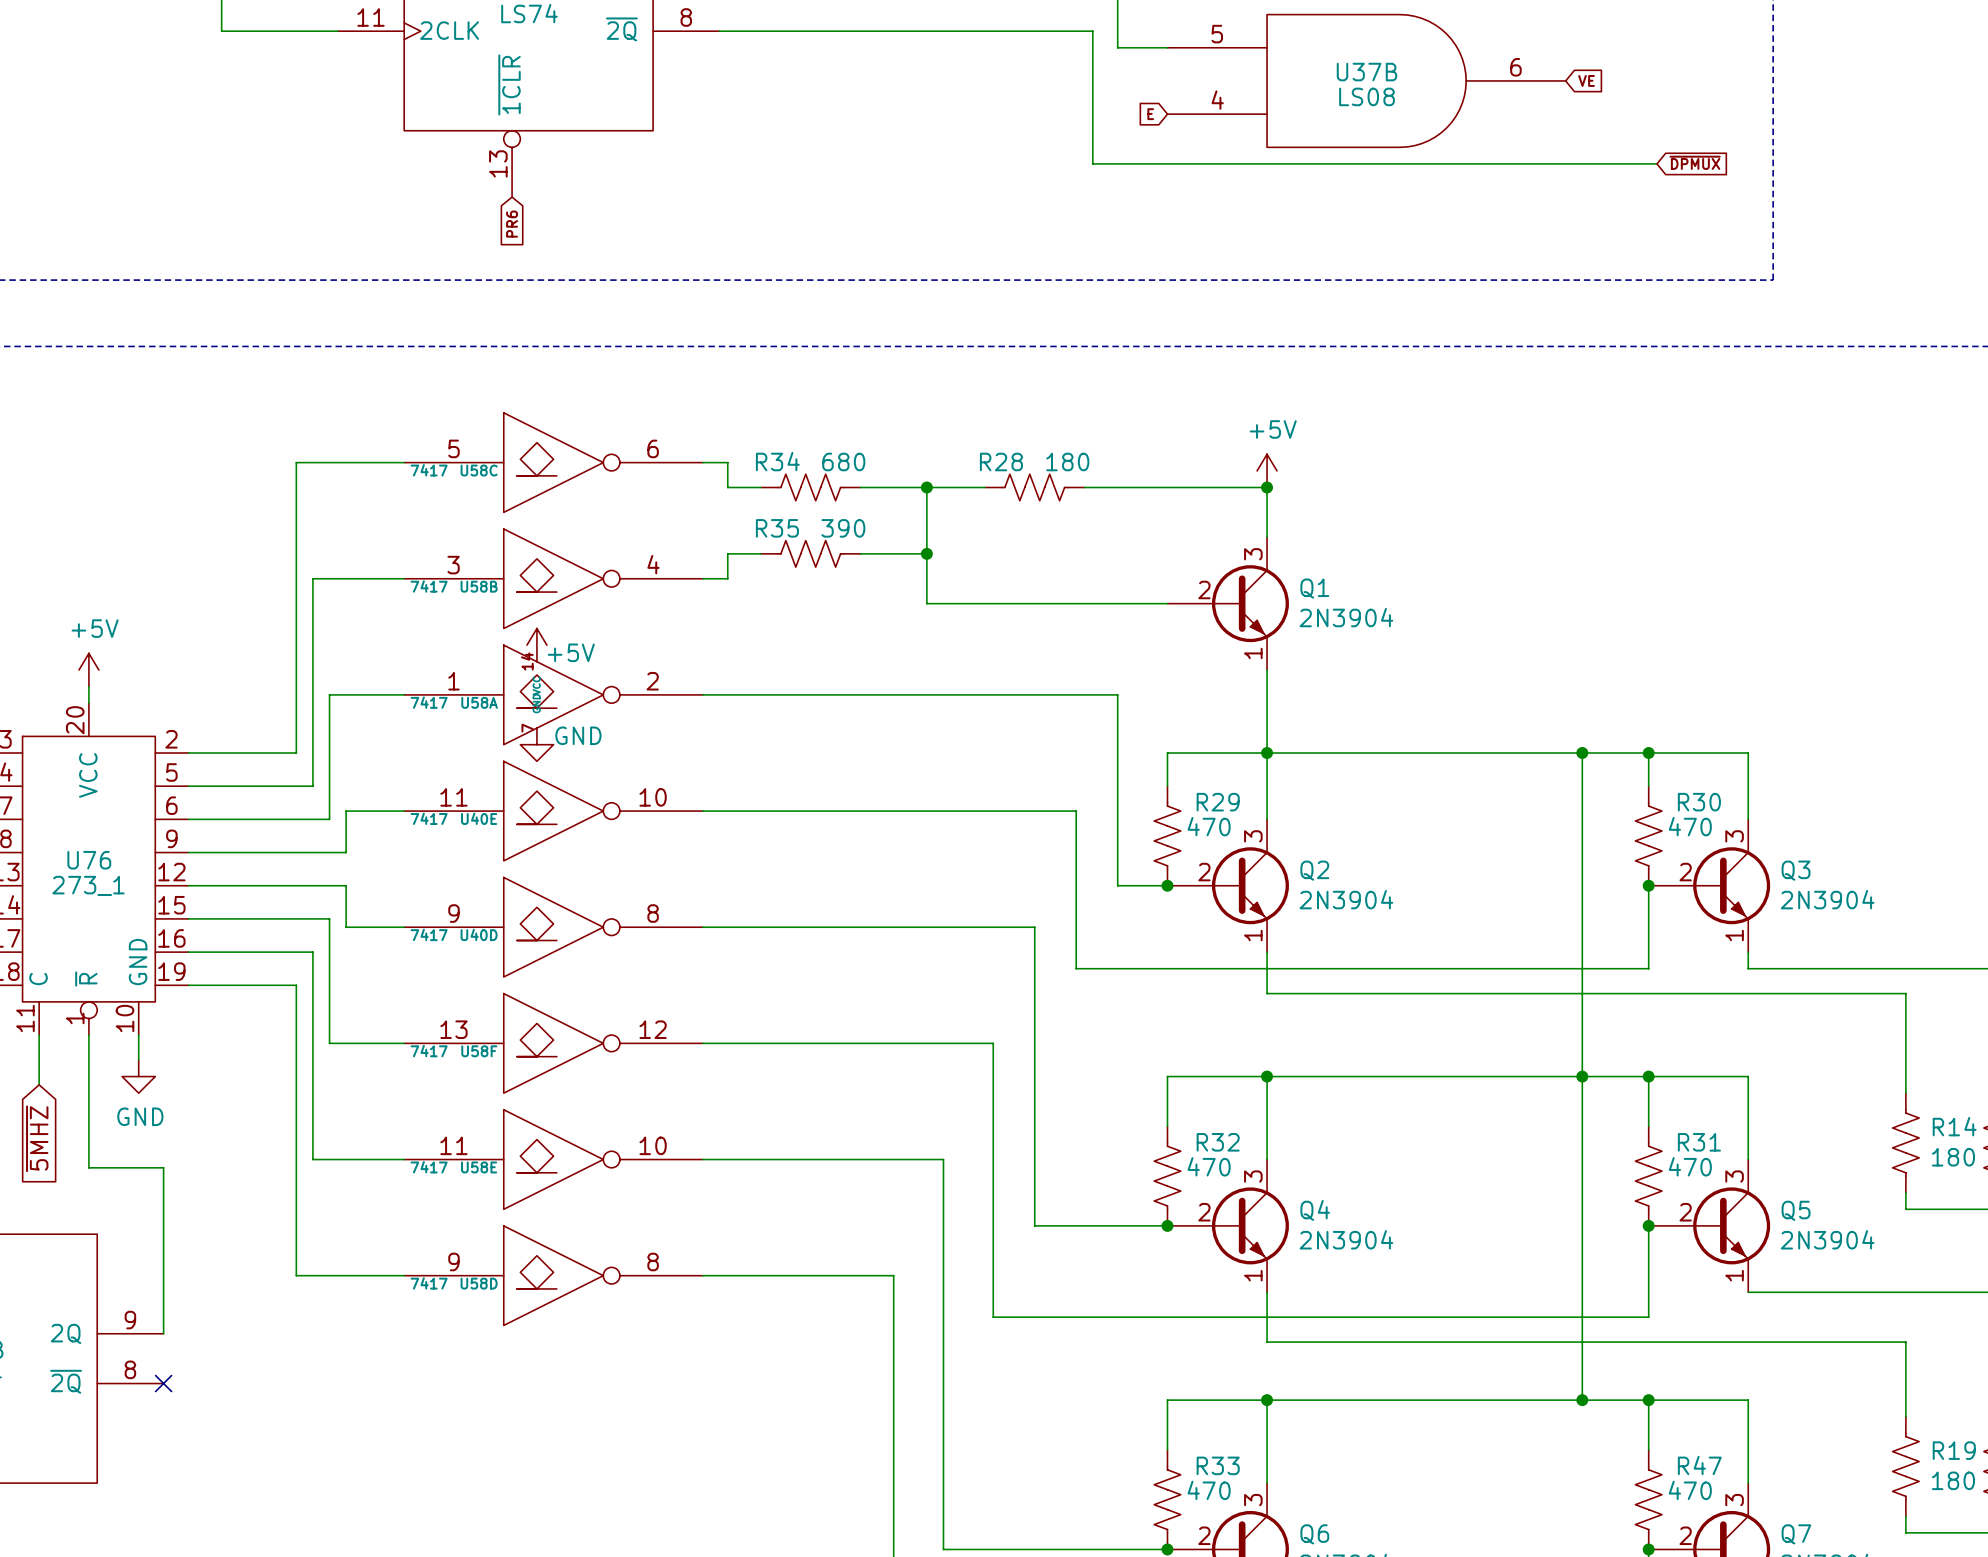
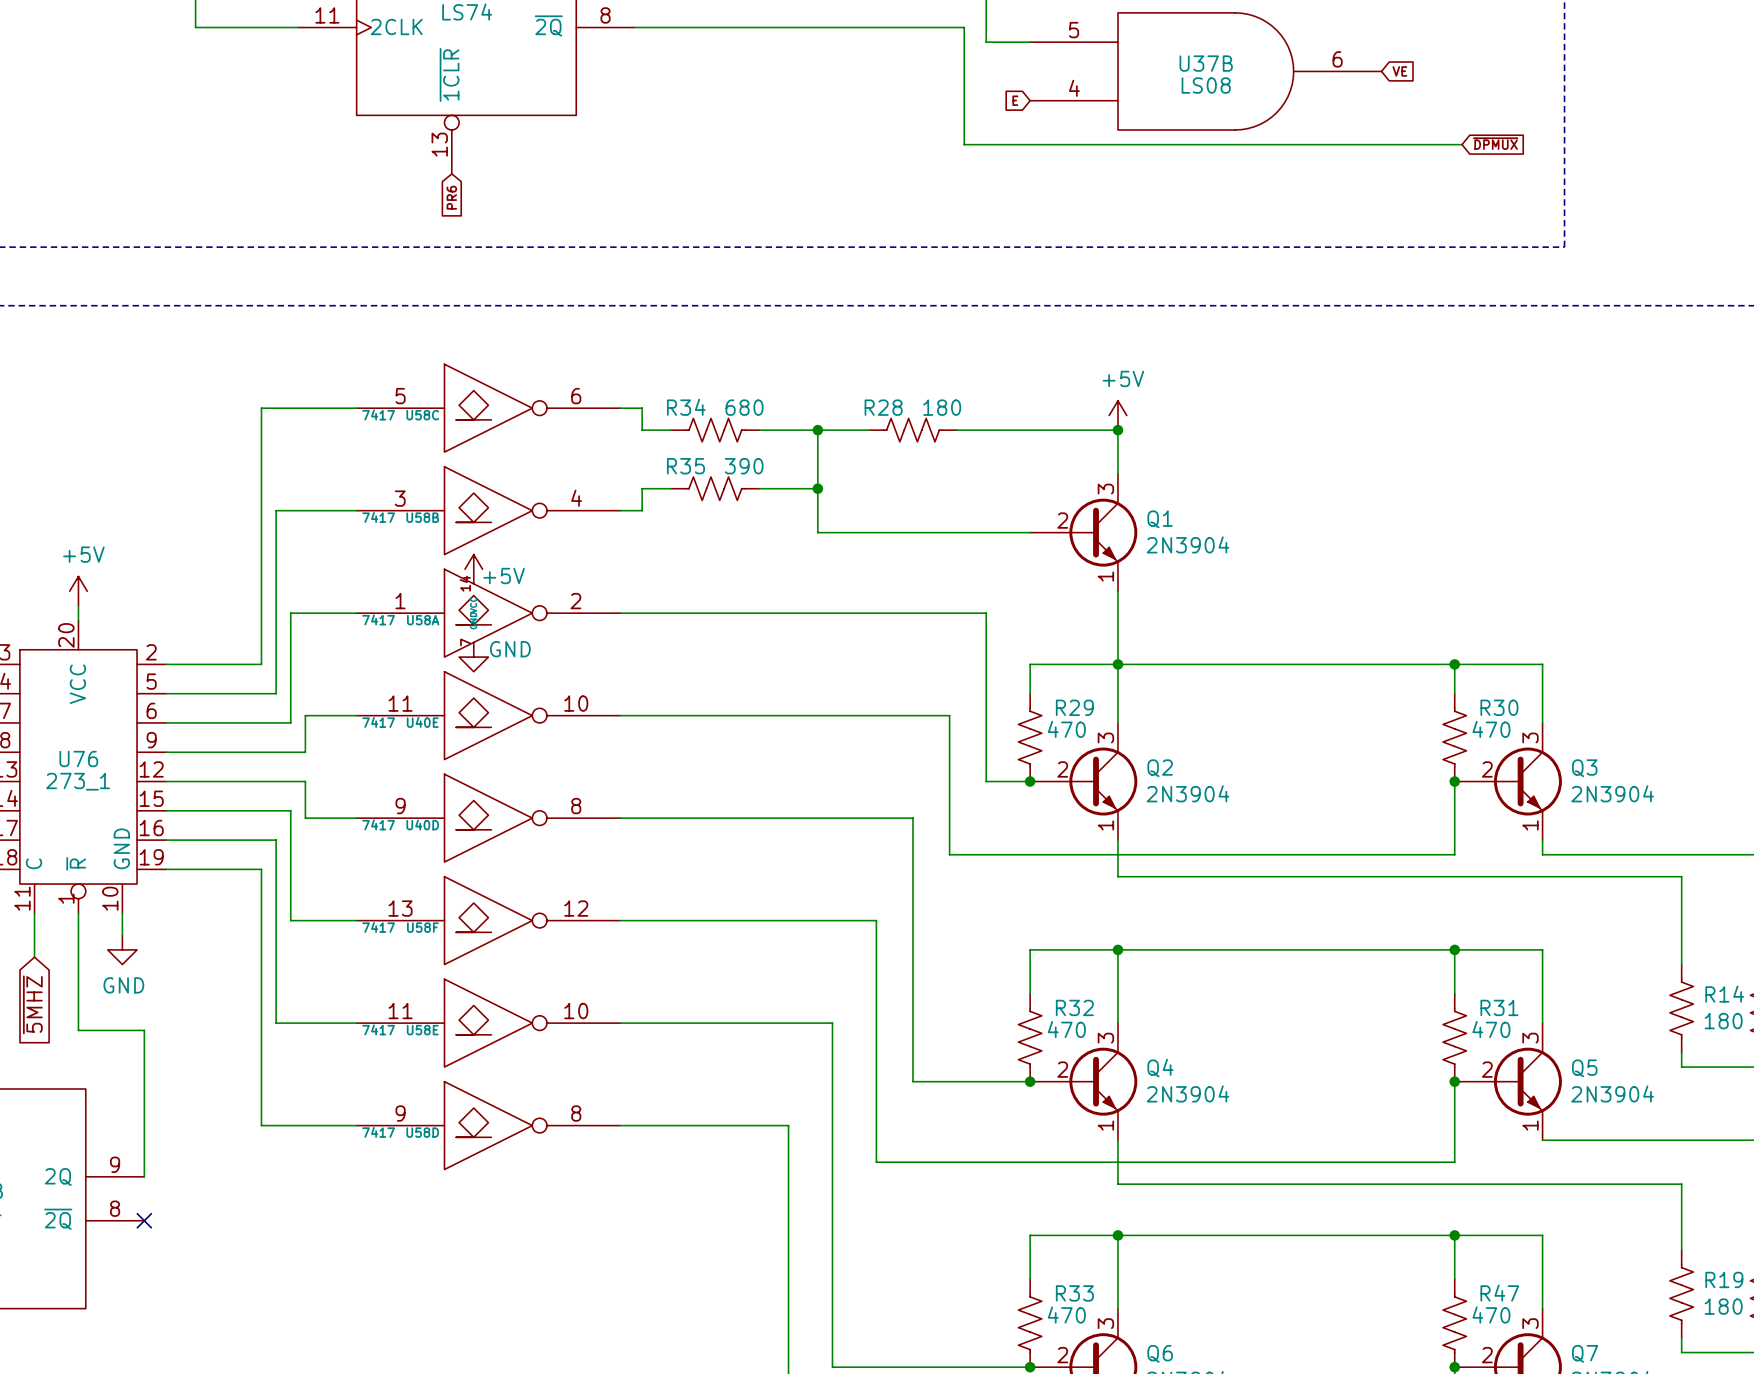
wire: (1582, 752) (1582, 1400) -> none
junction: (1582, 752) -> none
junction: (1582, 1076) -> none
junction: (1582, 1400) -> none

